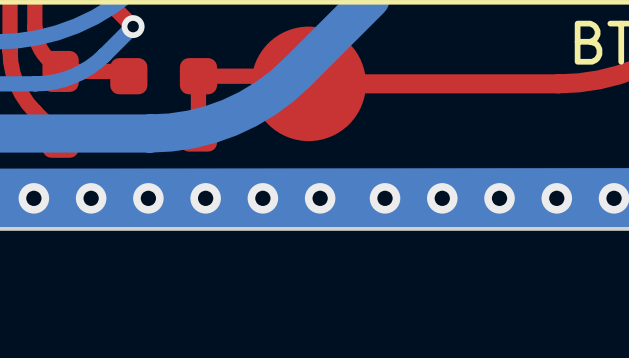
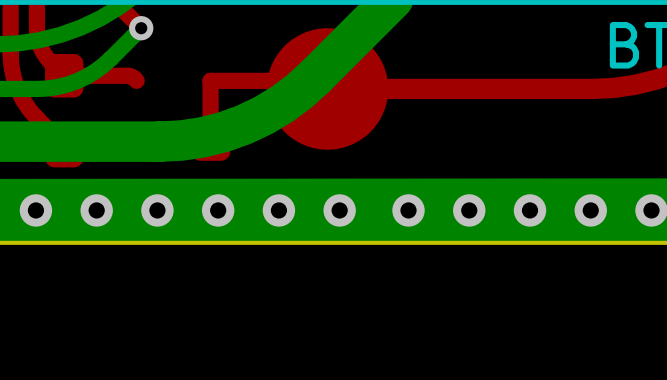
part: (163, 76) -> none

